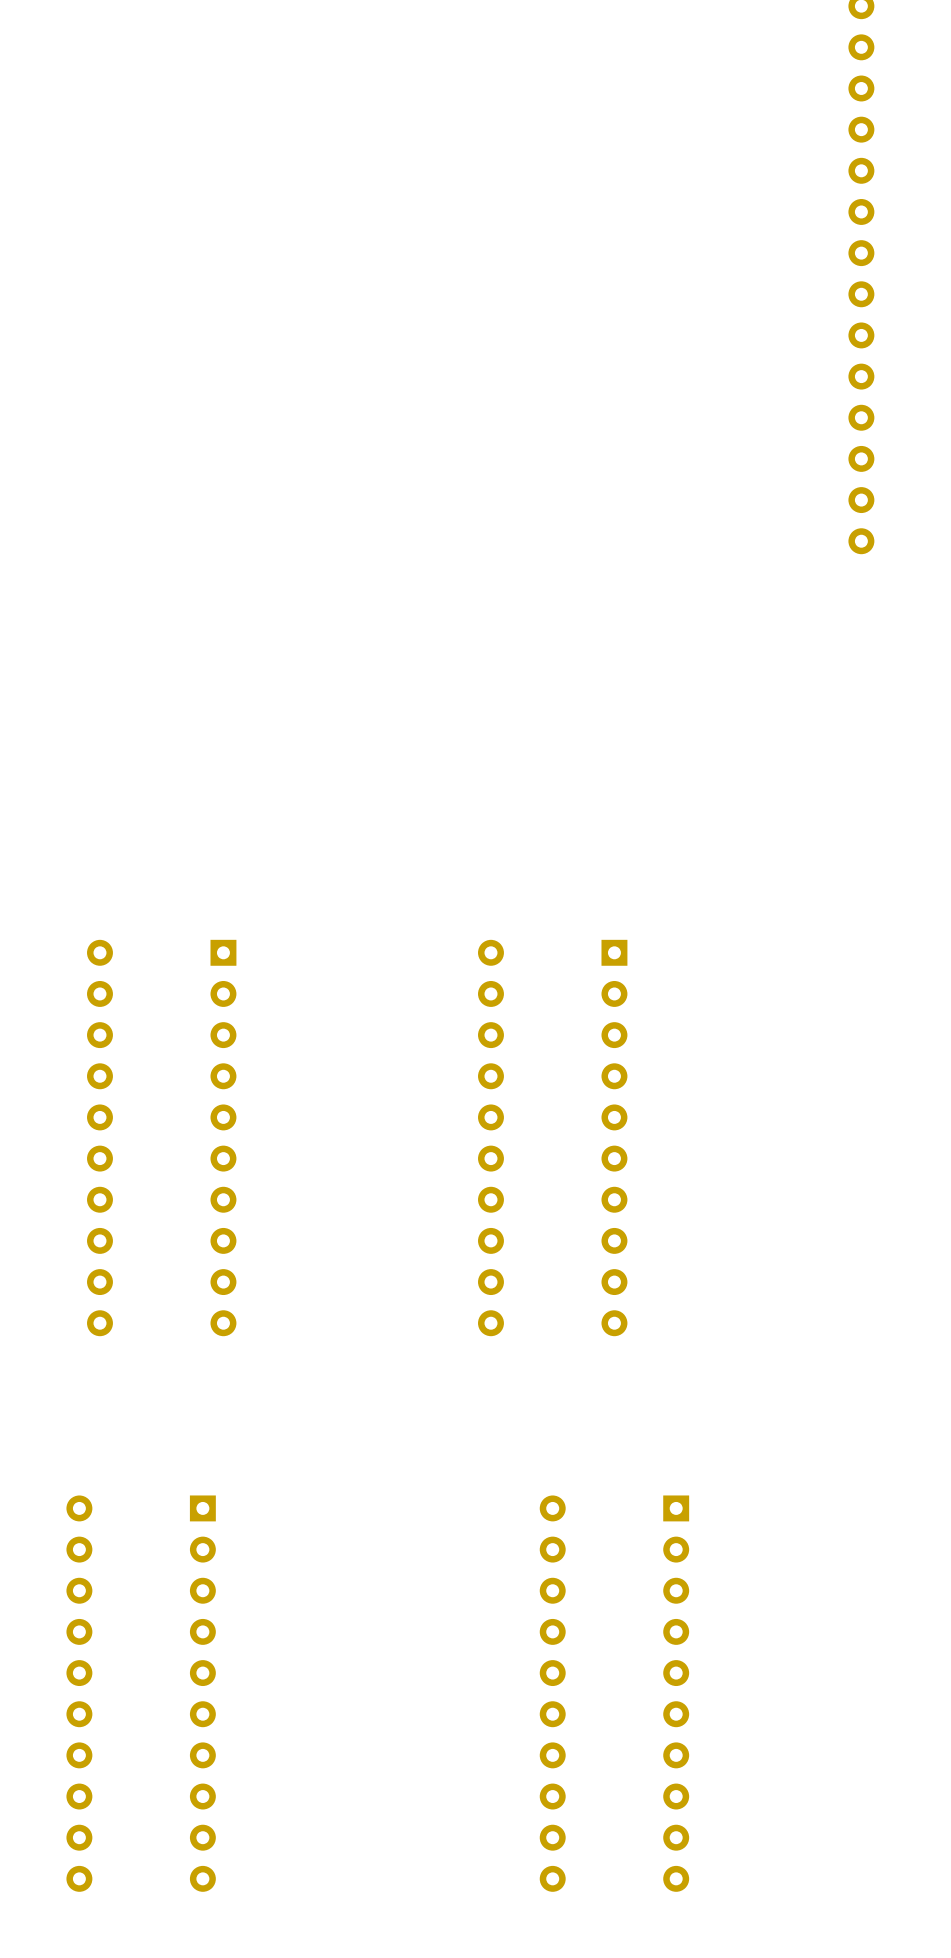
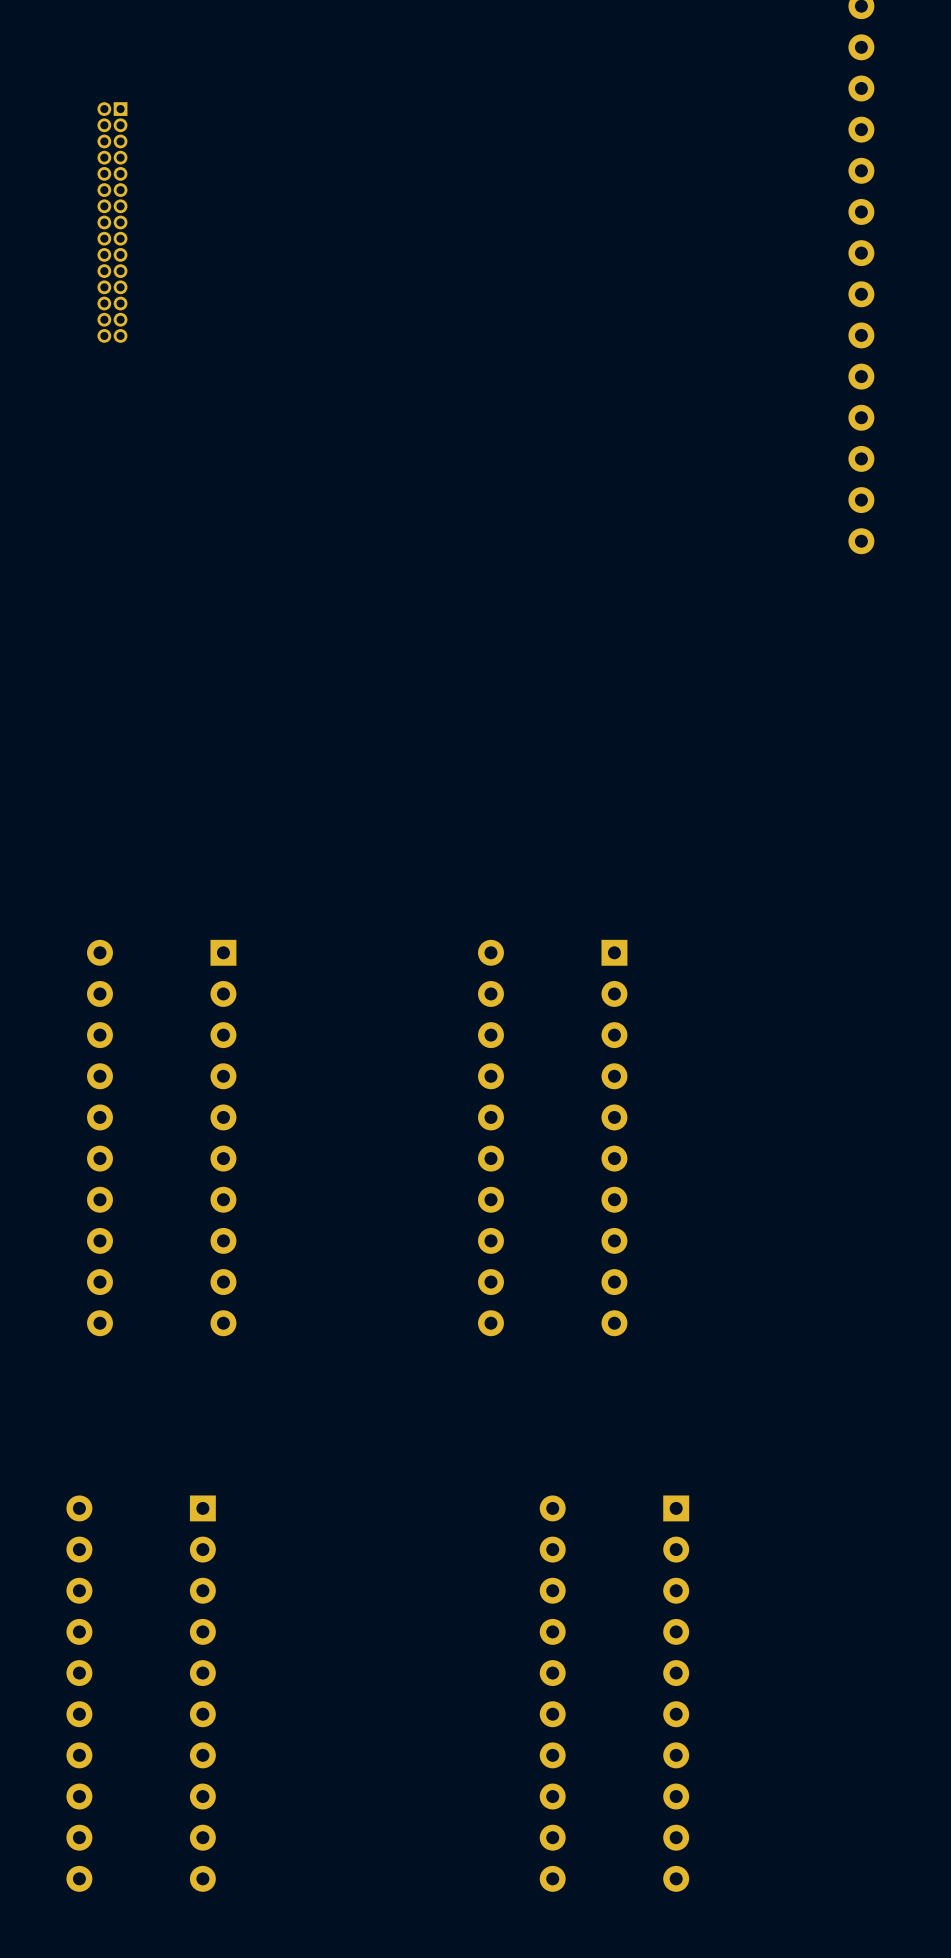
part: none -> (112, 222)

